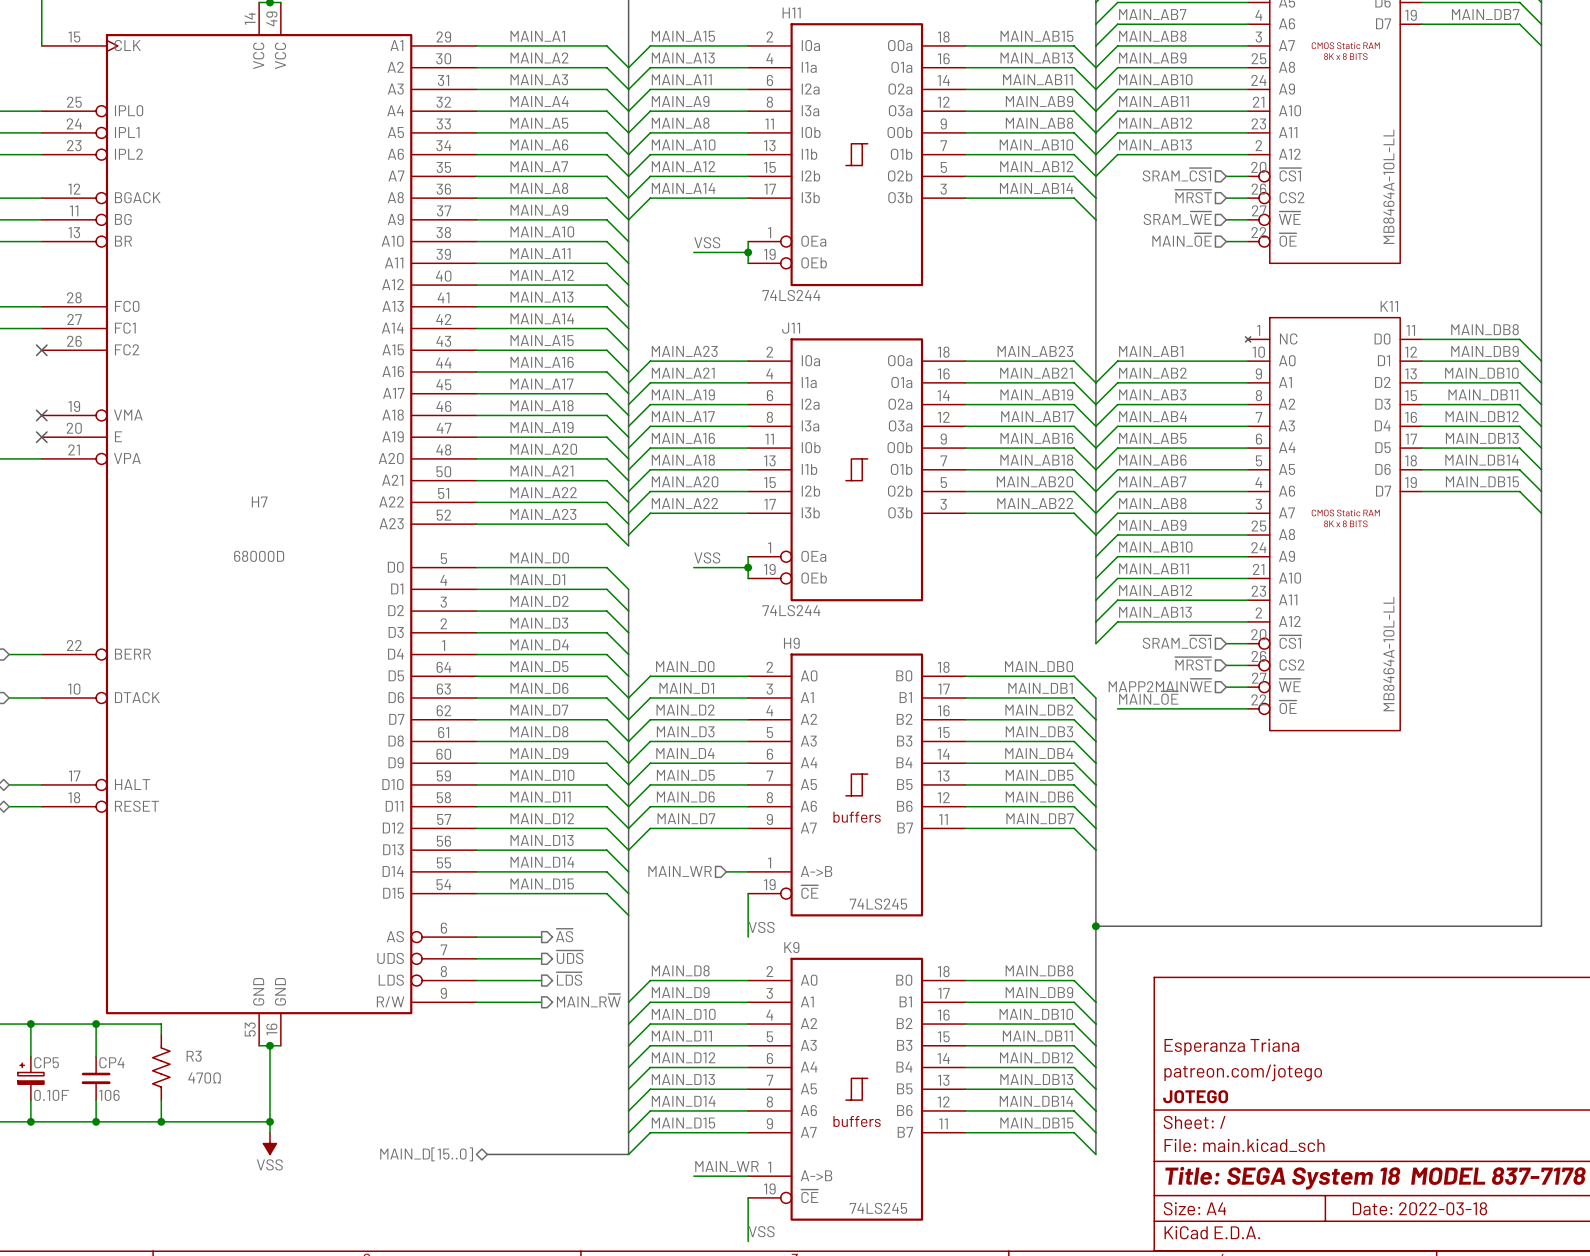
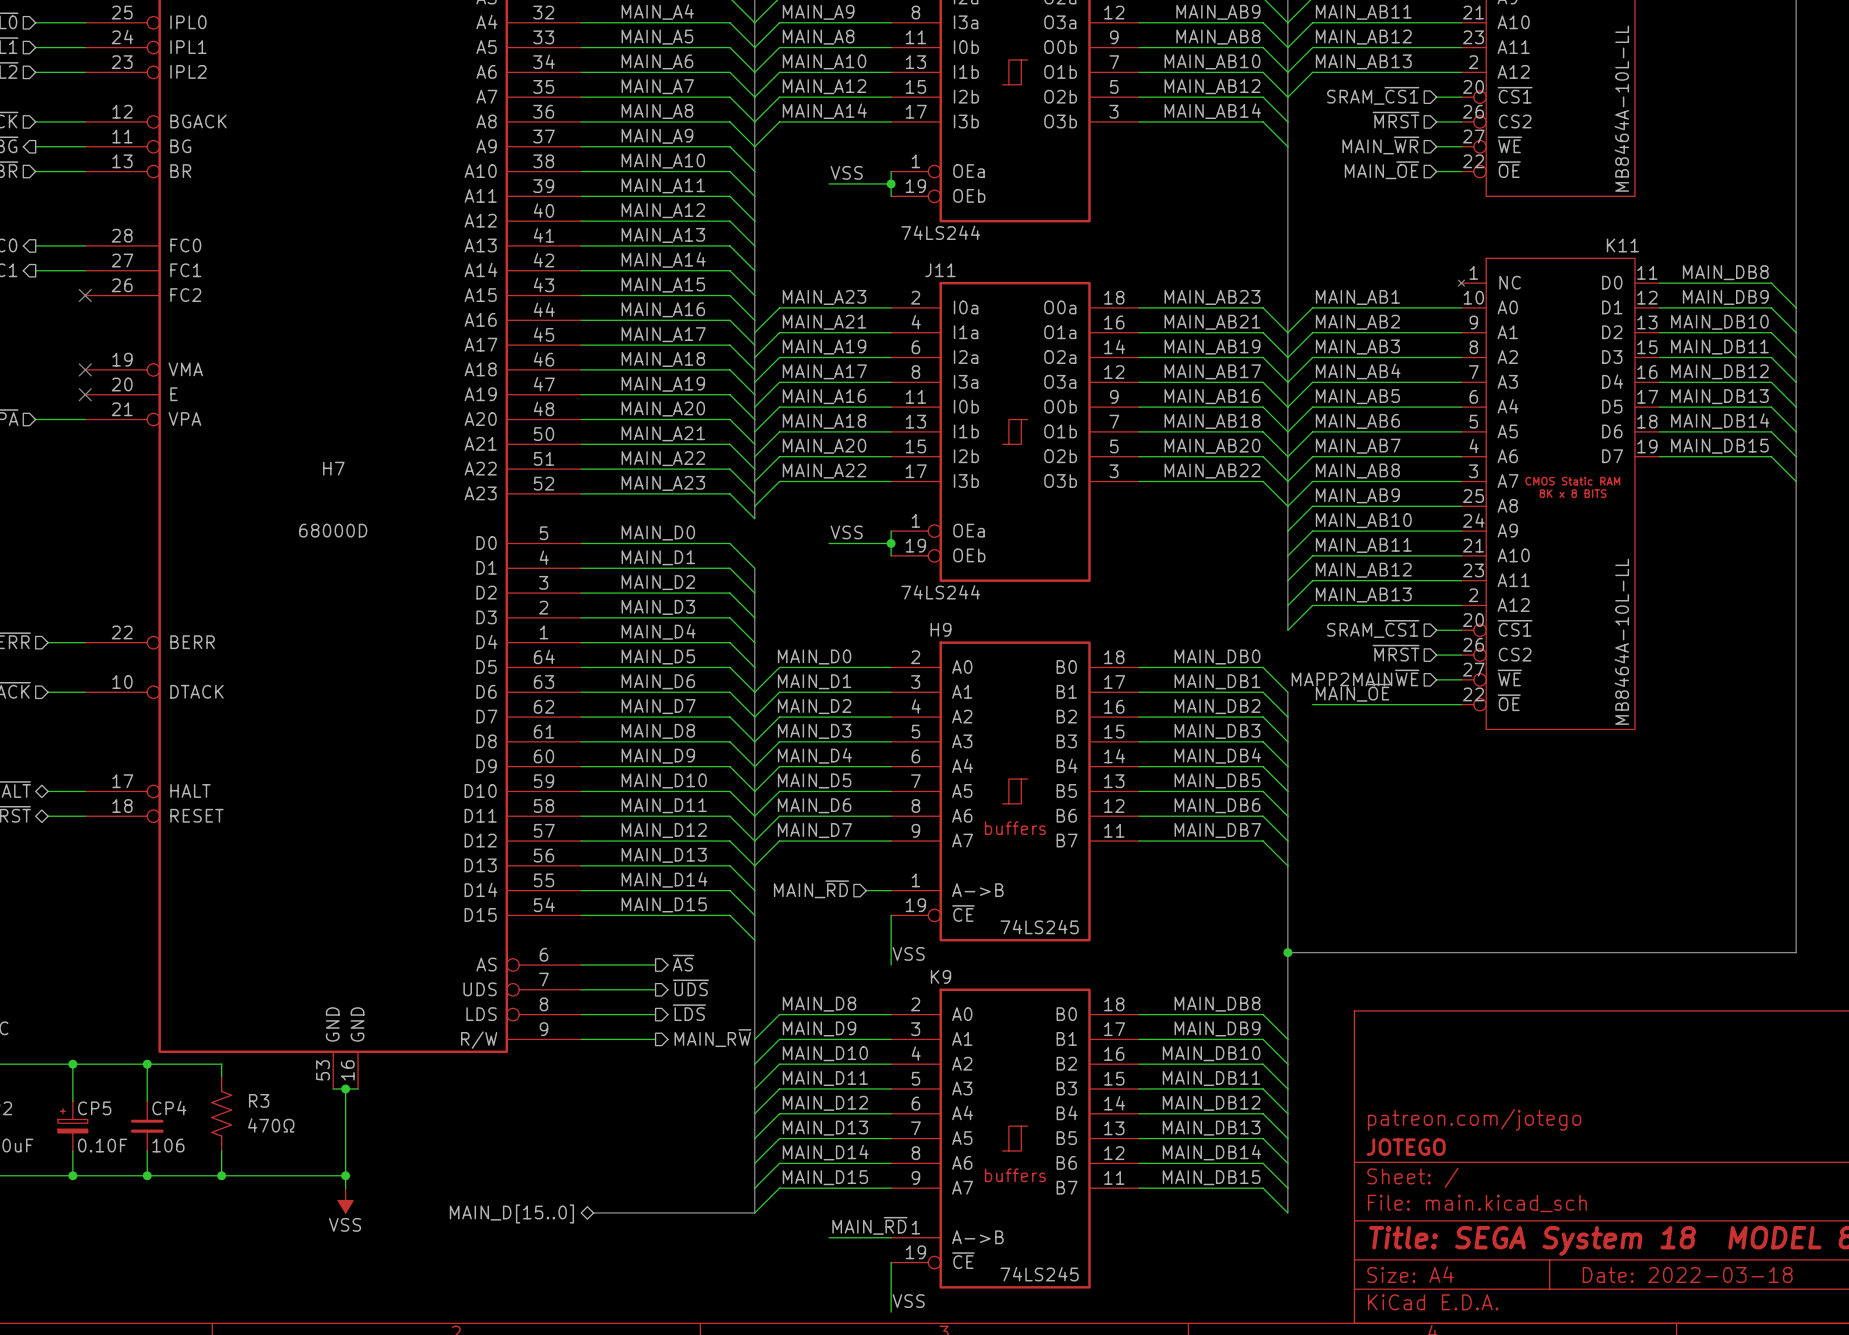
hierarchical label: SRAM_~{WE} (1177, 218) -> MAIN_~{WR} (1380, 145)
hierarchical label: MAIN_WR (680, 871) -> MAIN_~{RD} (811, 889)
title block: Esperanza Triana (1231, 1047) -> none
label: MAIN_WR (727, 1166) -> MAIN_~{RD} (869, 1225)

